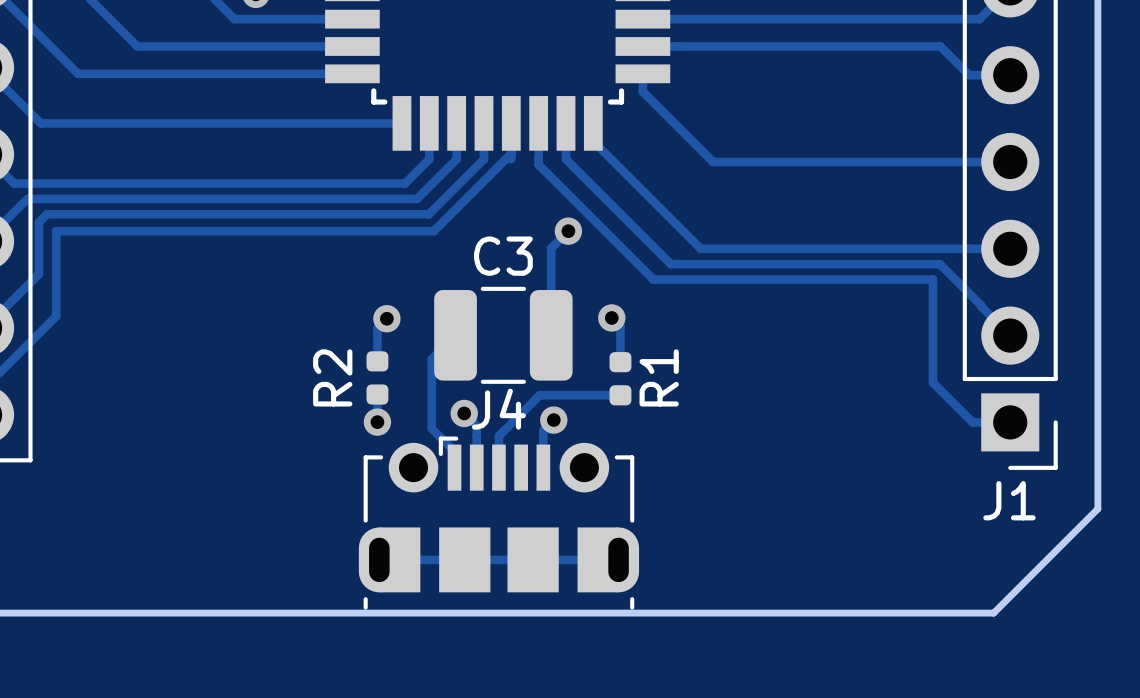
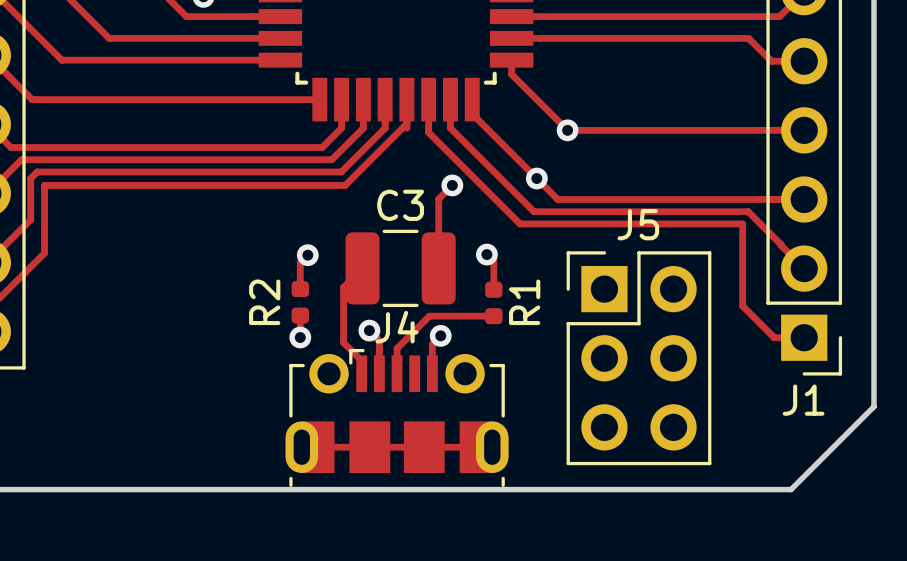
via: none -> (567, 130)
via: none -> (536, 178)
J5: none -> (638, 358)

